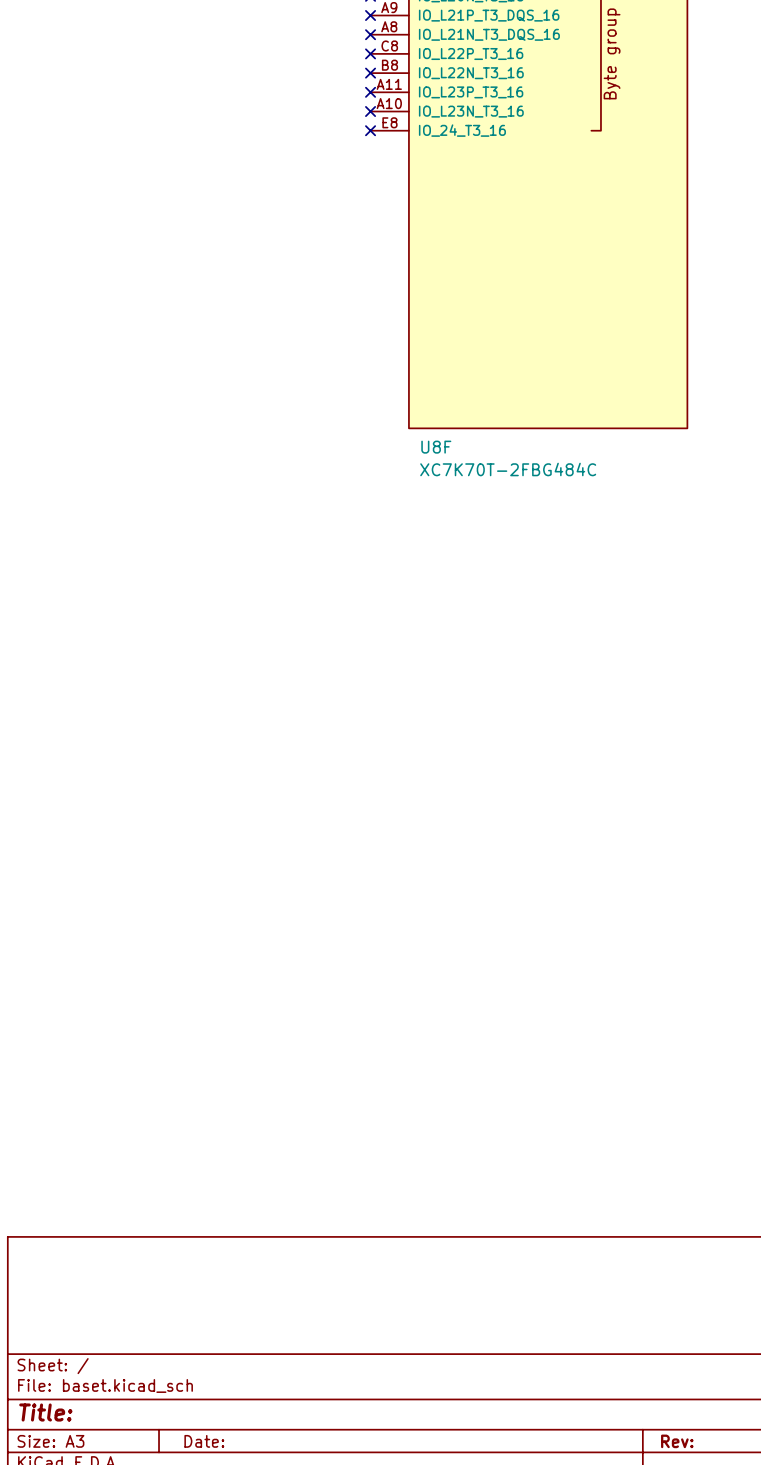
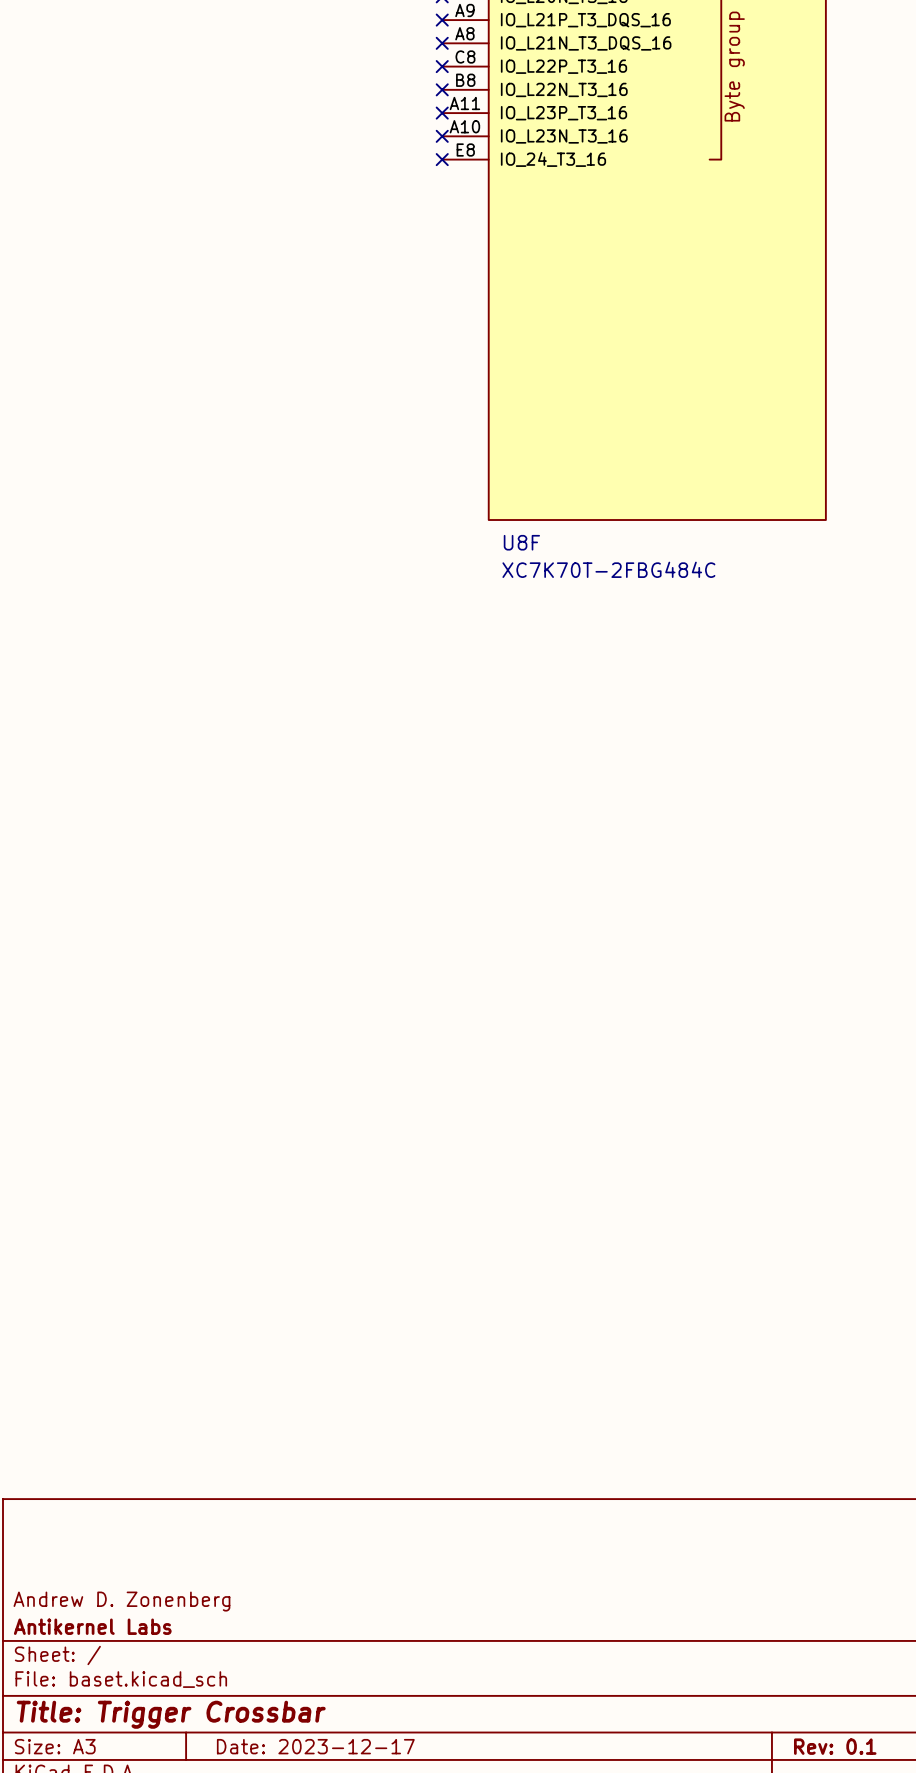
title block: none -> Andrew D. Zonenberg (121, 1601)
title block: none -> Antikernel Labs (92, 1626)
title block: Title: (45, 1412) -> Title: Trigger Crossbar (171, 1714)
title block: Date: (204, 1441) -> Date: 2023-12-17 (315, 1746)
title block: Rev: (677, 1441) -> Rev: 0.1 (835, 1746)

